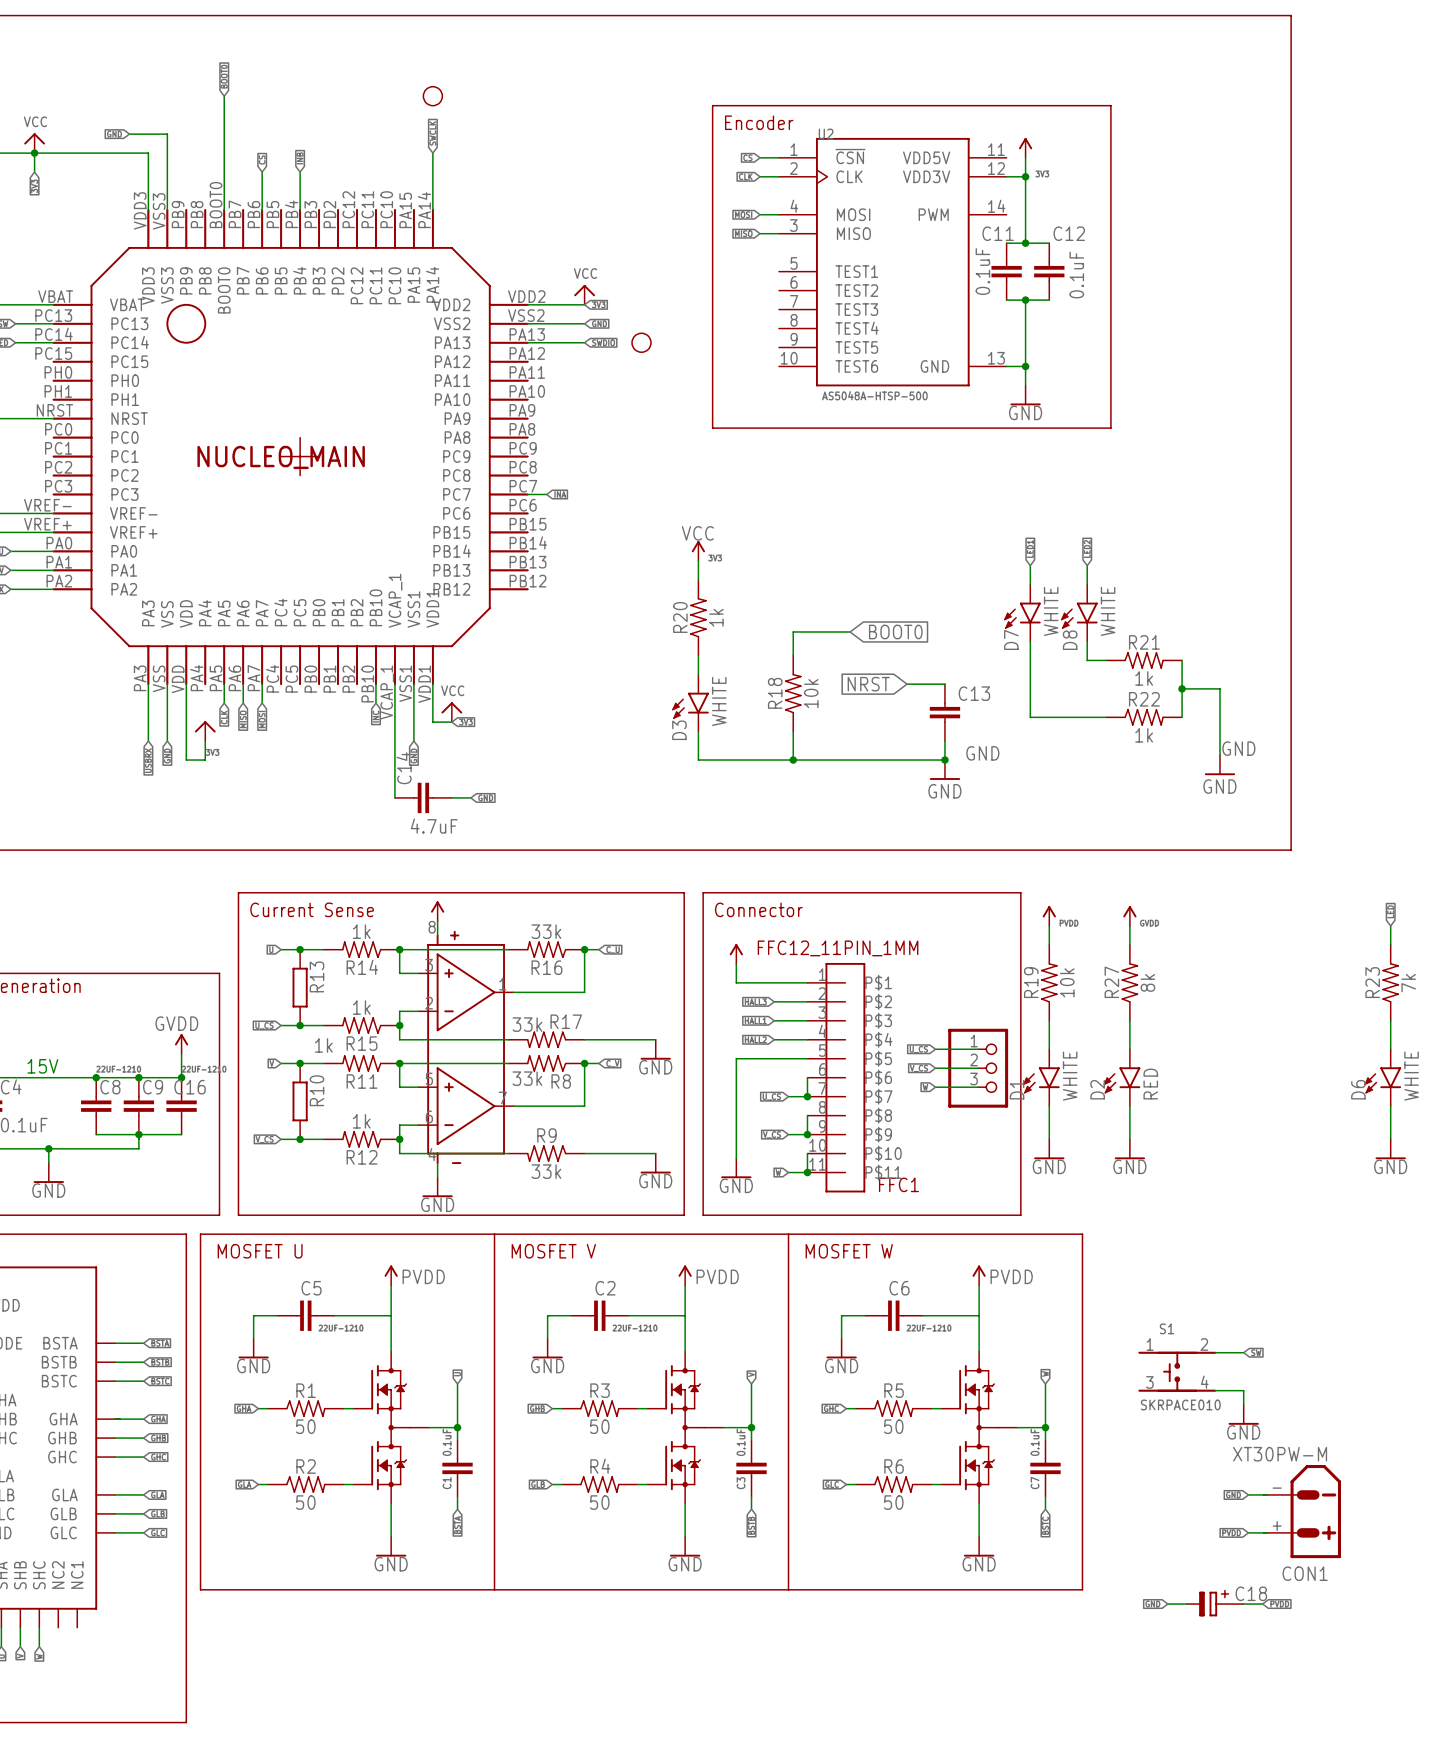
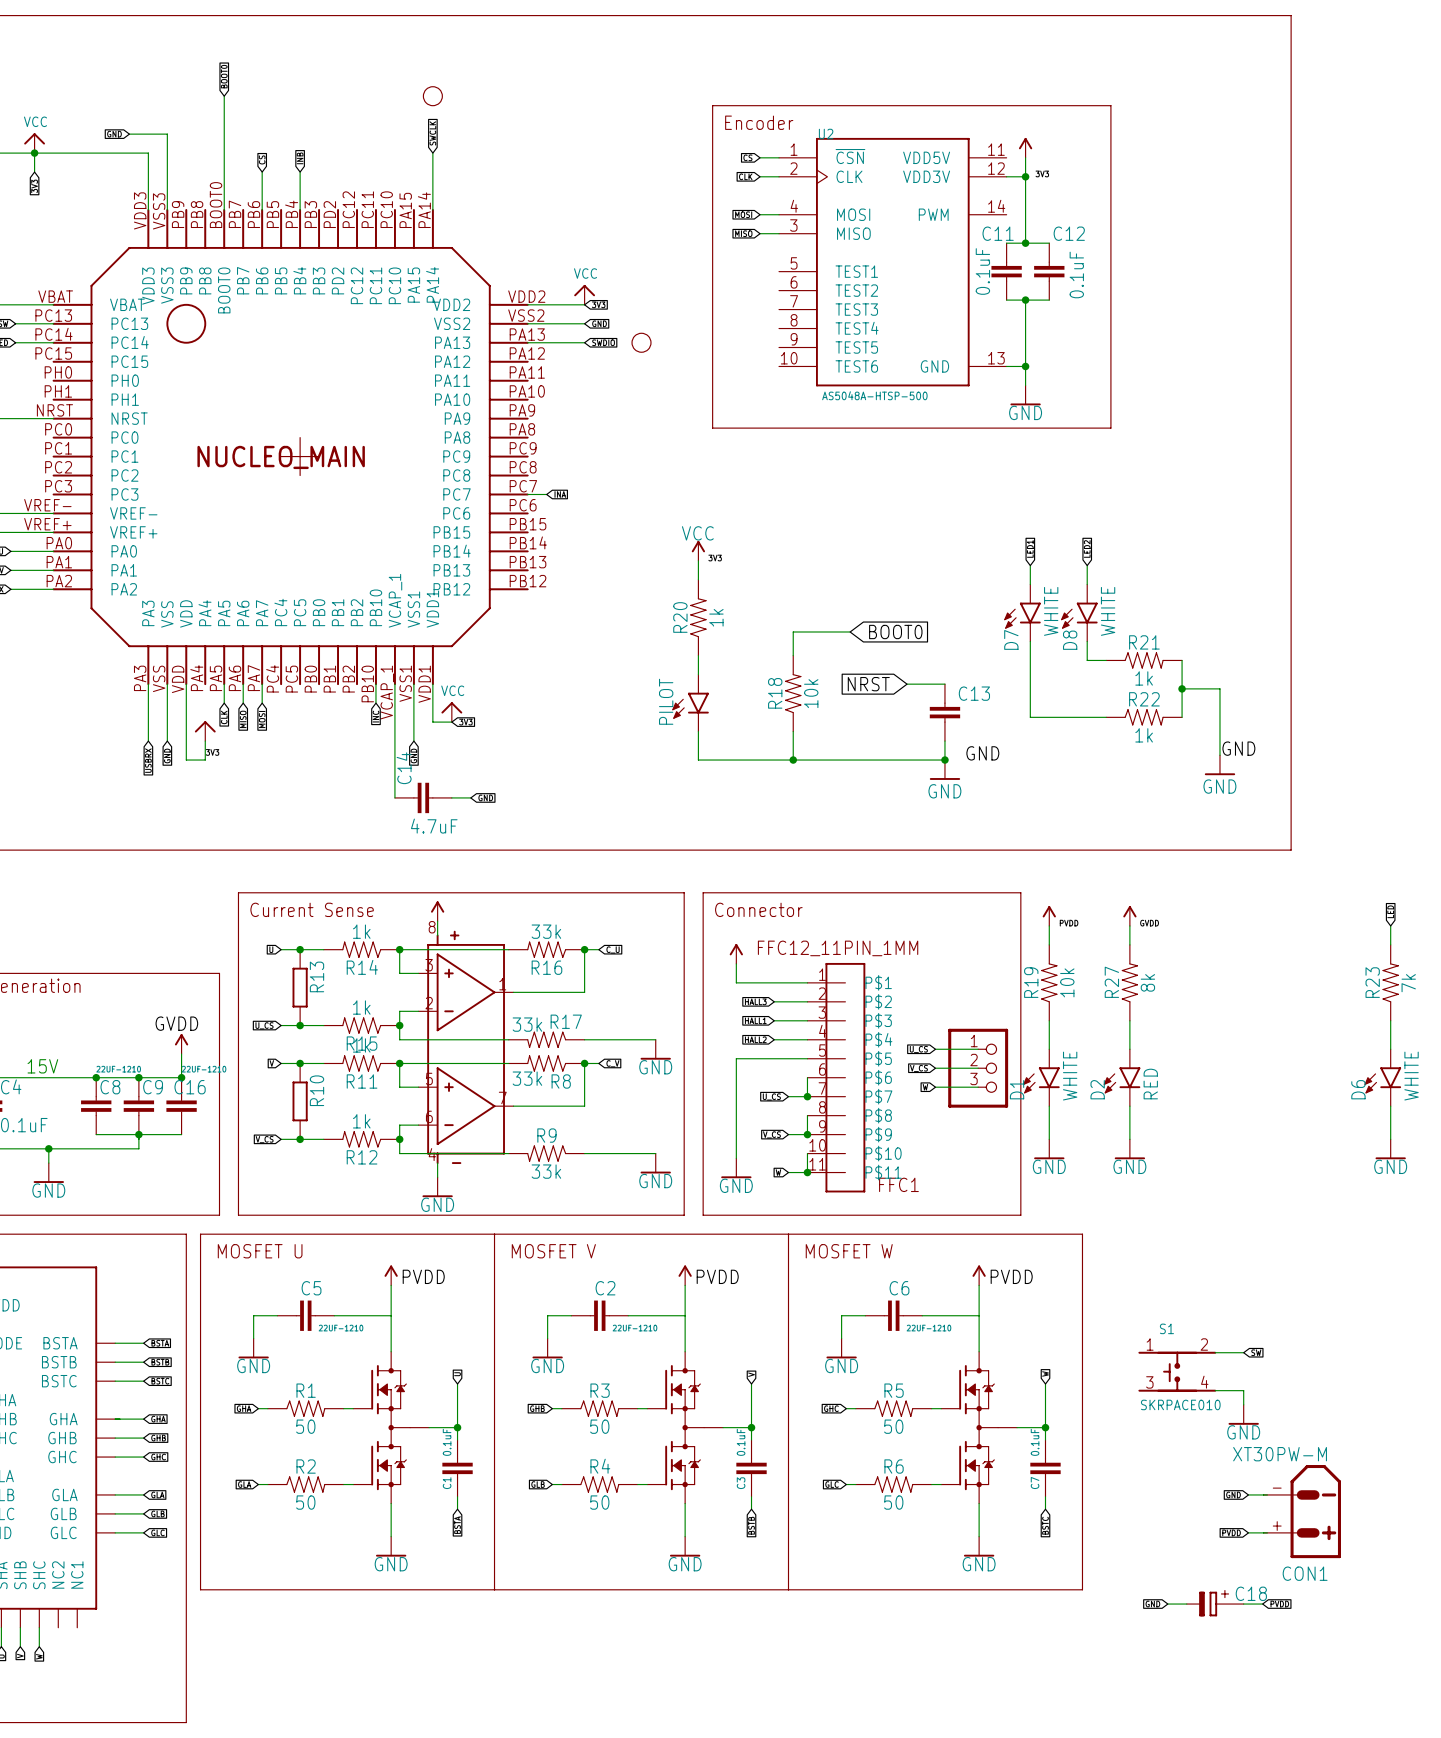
D3 value: WHITE (719, 701) -> none
D3 name: D3 (679, 730) -> PILOT (666, 701)
R11 value position: 1k (323, 1045) -> 1k (361, 1045)

